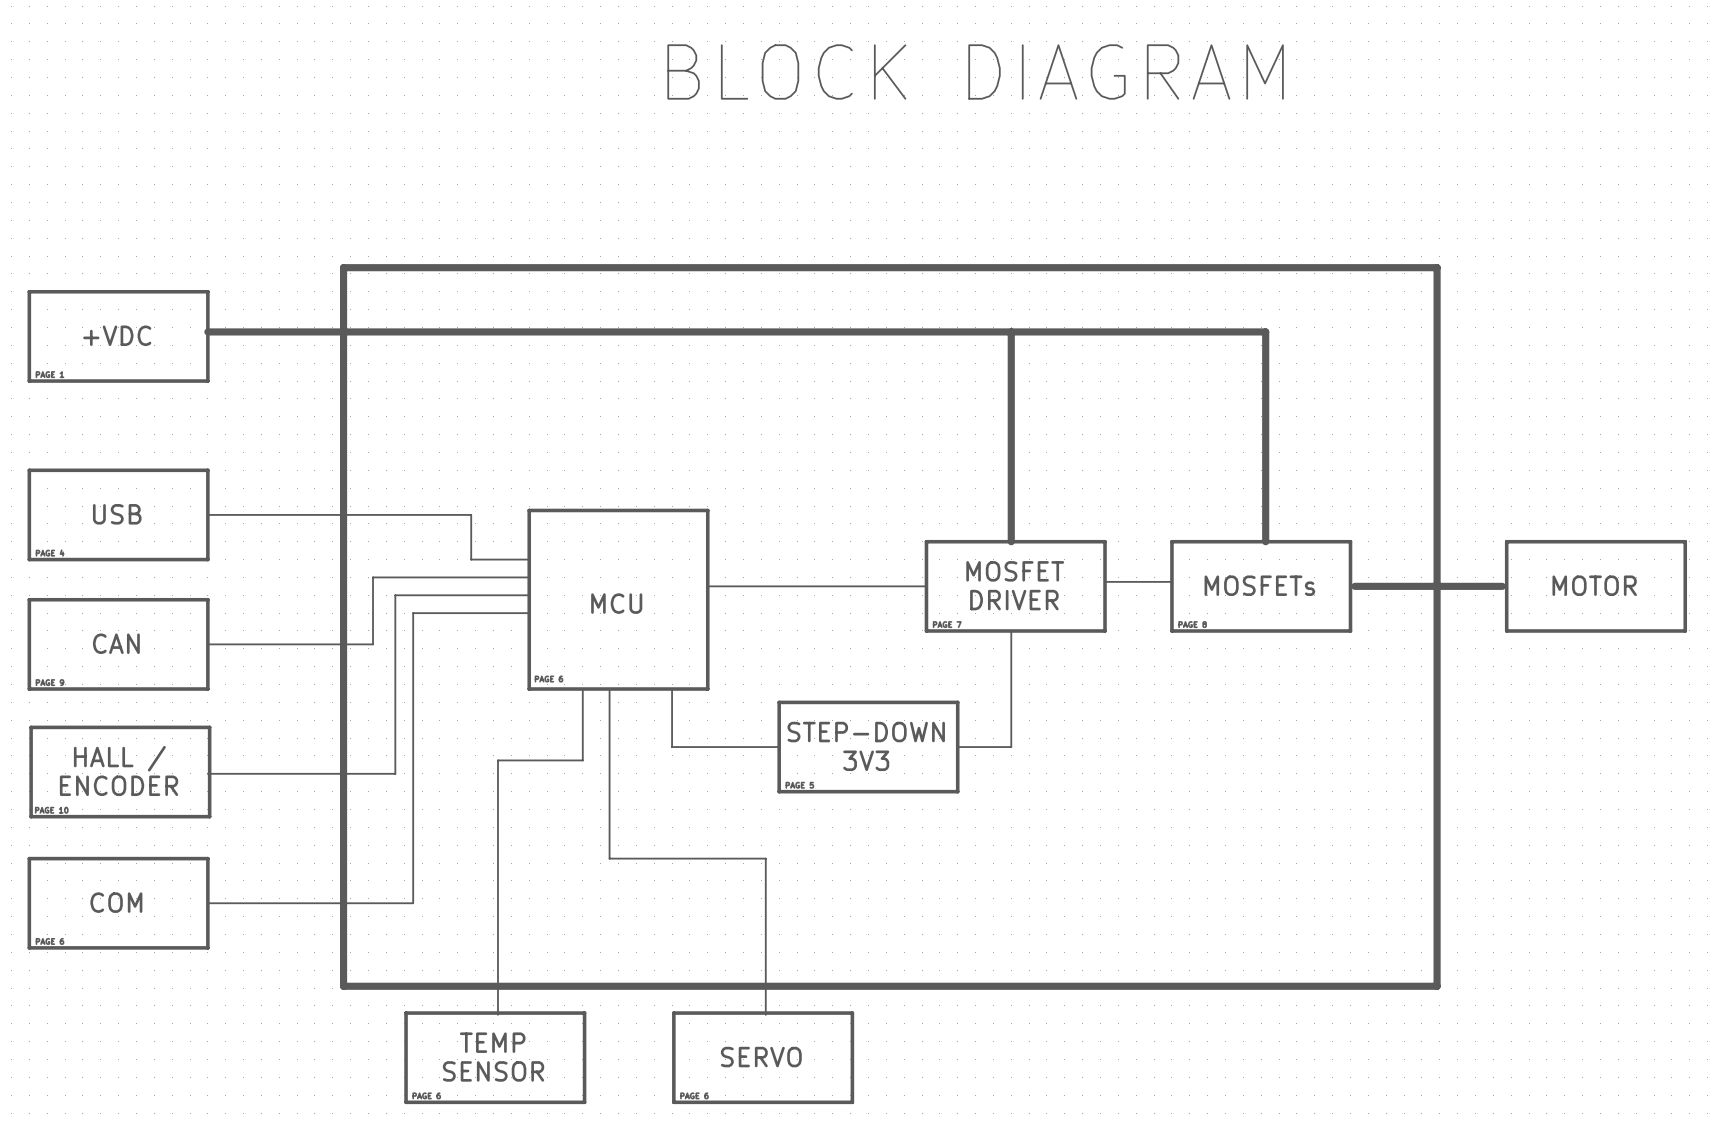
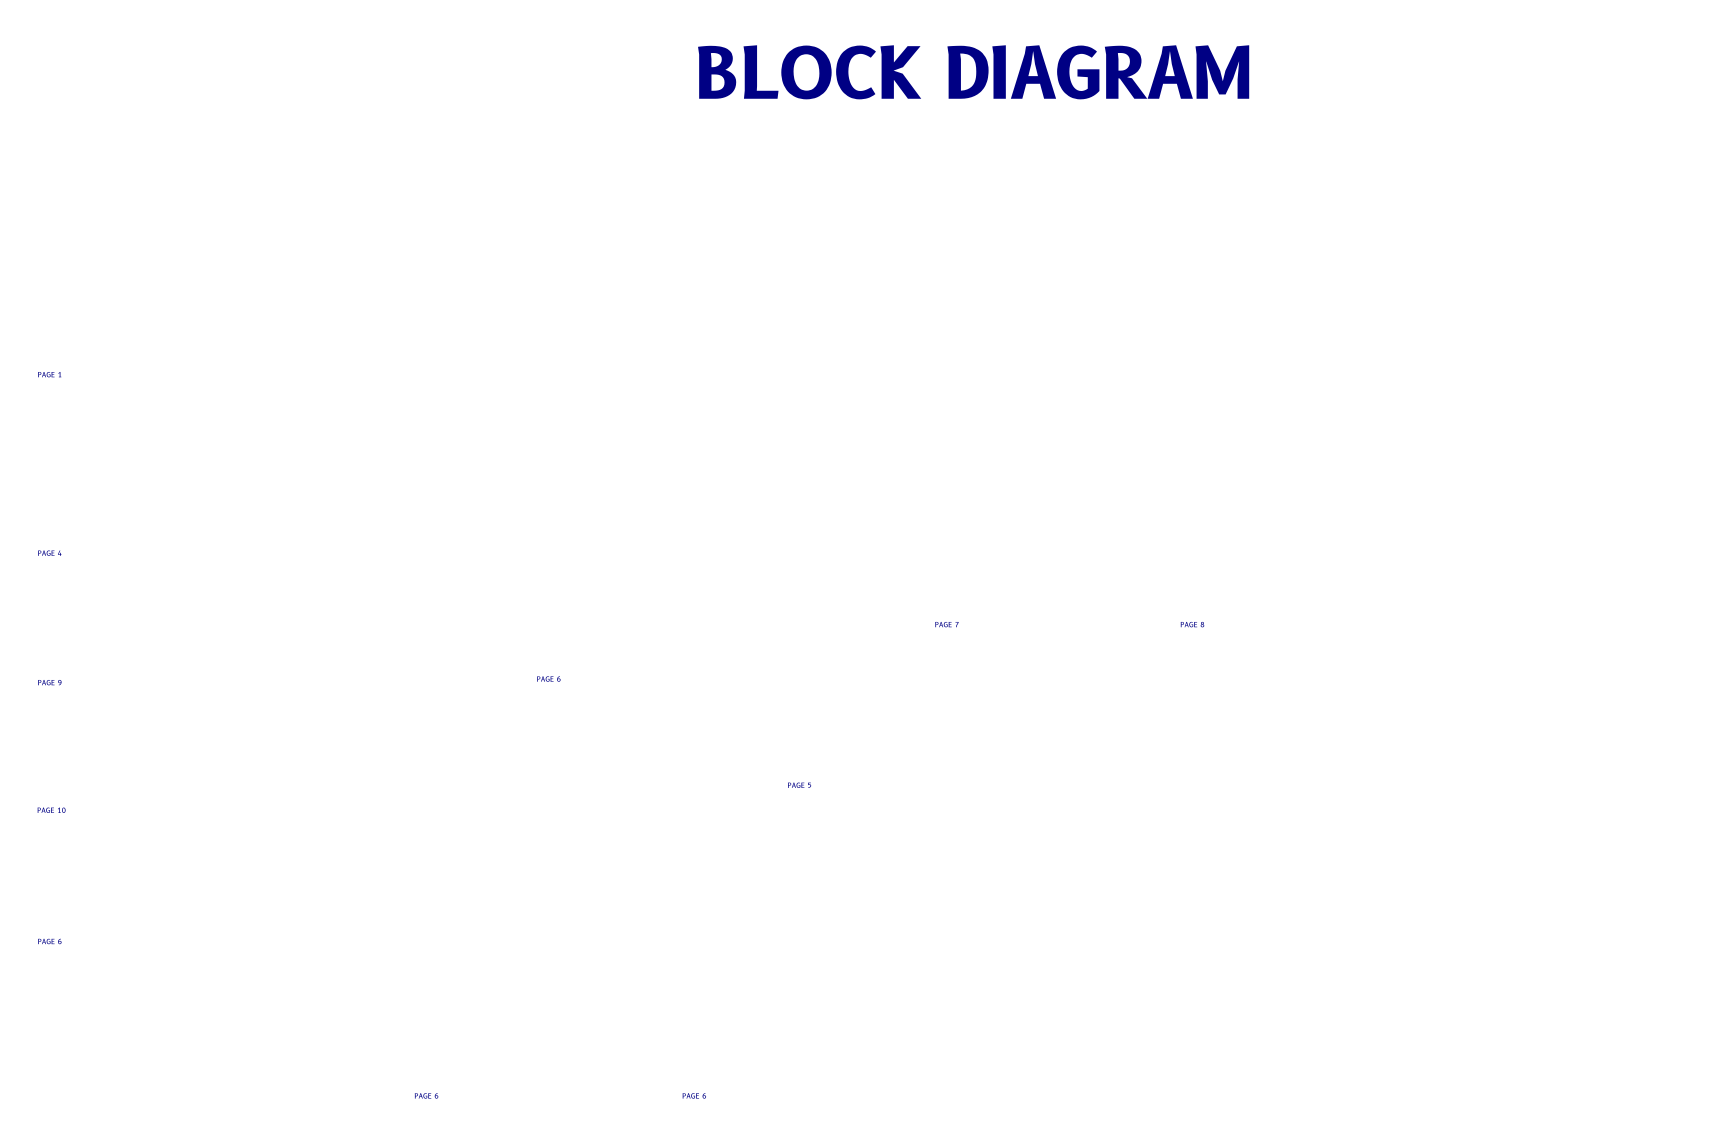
line: (343, 267) (1437, 267) (1437, 986) (343, 986) (343, 267) -> none
line: (29, 291) (207, 291) (207, 381) (29, 381) (29, 291) -> none
line: (207, 331) (1265, 331) (1265, 541) -> none
line: (1011, 331) (1011, 541) -> none
text: +VDC (117, 335) -> none
line: (29, 470) (29, 559) (207, 559) (207, 470) (29, 470) -> none
line: (529, 510) (707, 510) (707, 689) (529, 689) (529, 510) -> none
text: USB (117, 514) -> none
line: (207, 514) (471, 514) (471, 559) (529, 559) -> none
line: (926, 541) (1105, 541) (1105, 630) (926, 630) (926, 541) -> none
line: (1171, 541) (1350, 541) (1350, 630) (1171, 630) (1171, 541) -> none
line: (1506, 541) (1685, 541) (1685, 630) (1506, 630) (1506, 541) -> none
text: MOSFET (1015, 571) -> none
line: (529, 577) (373, 577) (373, 644) (207, 644) -> none
line: (707, 581) (707, 586) (926, 586) -> none
line: (1105, 581) (1171, 581) -> none
text: MOSFETs (1259, 585) -> none
text: MOTOR (1594, 585) -> none
line: (1354, 586) (1502, 586) -> none
line: (529, 595) (395, 595) (395, 773) (207, 773) -> none
line: (29, 599) (29, 689) (207, 689) (207, 599) (29, 599) -> none
text: DRIVER (1014, 600) -> none
text: MCU (616, 603) -> none
line: (529, 613) (413, 613) (413, 903) (207, 903) -> none
line: (1011, 630) (1011, 747) (957, 747) -> none
text: CAN (116, 643) -> none
line: (582, 689) (582, 760) (497, 760) (497, 1014) -> none
line: (609, 689) (609, 858) (765, 858) (765, 1014) -> none
line: (672, 689) (672, 747) (779, 747) -> none
line: (779, 702) (957, 702) (957, 791) (779, 791) (779, 702) -> none
line: (31, 727) (209, 727) (209, 816) (31, 816) (31, 727) -> none
text: STEP-DOWN (866, 732) -> none
text: HALL / (119, 758) -> none
text: 3V3 (866, 760) -> none
text: ENCODER (119, 785) -> none
line: (29, 858) (29, 947) (207, 947) (207, 858) (29, 858) -> none
text: COM (116, 902) -> none
line: (406, 1013) (584, 1013) (584, 1102) (406, 1102) (406, 1013) -> none
line: (673, 1013) (852, 1013) (852, 1102) (673, 1102) (673, 1013) -> none
text: TEMP (492, 1042) -> none
text: SERVO (761, 1057) -> none
text: SENSOR (493, 1071) -> none

